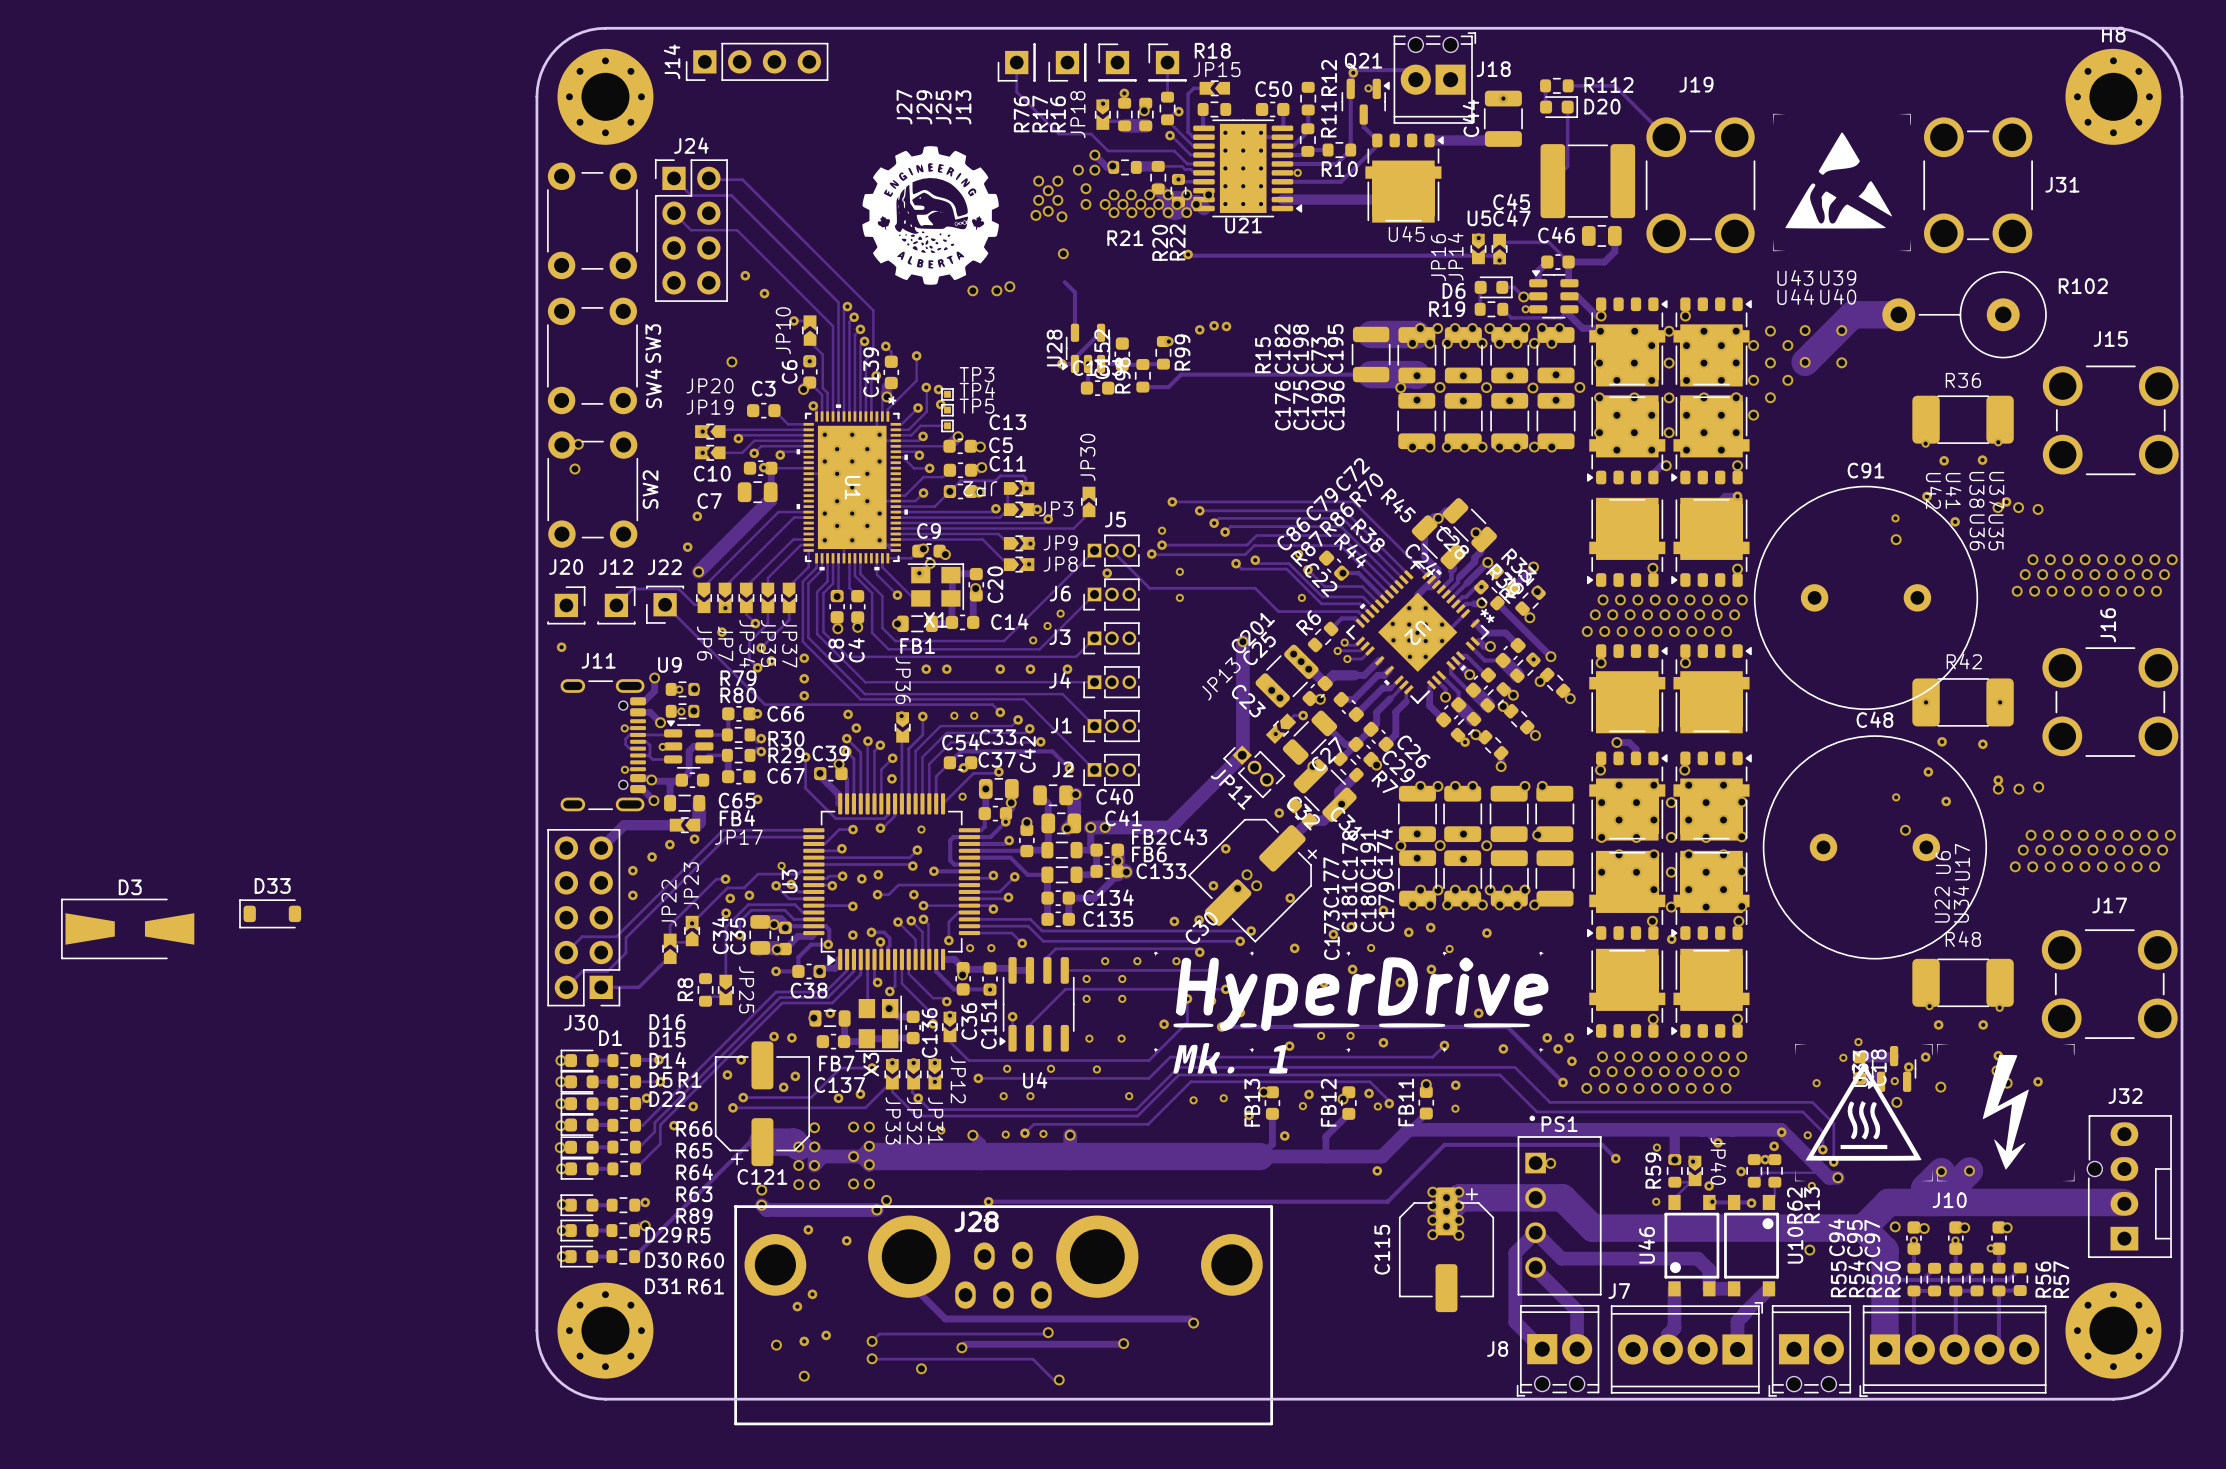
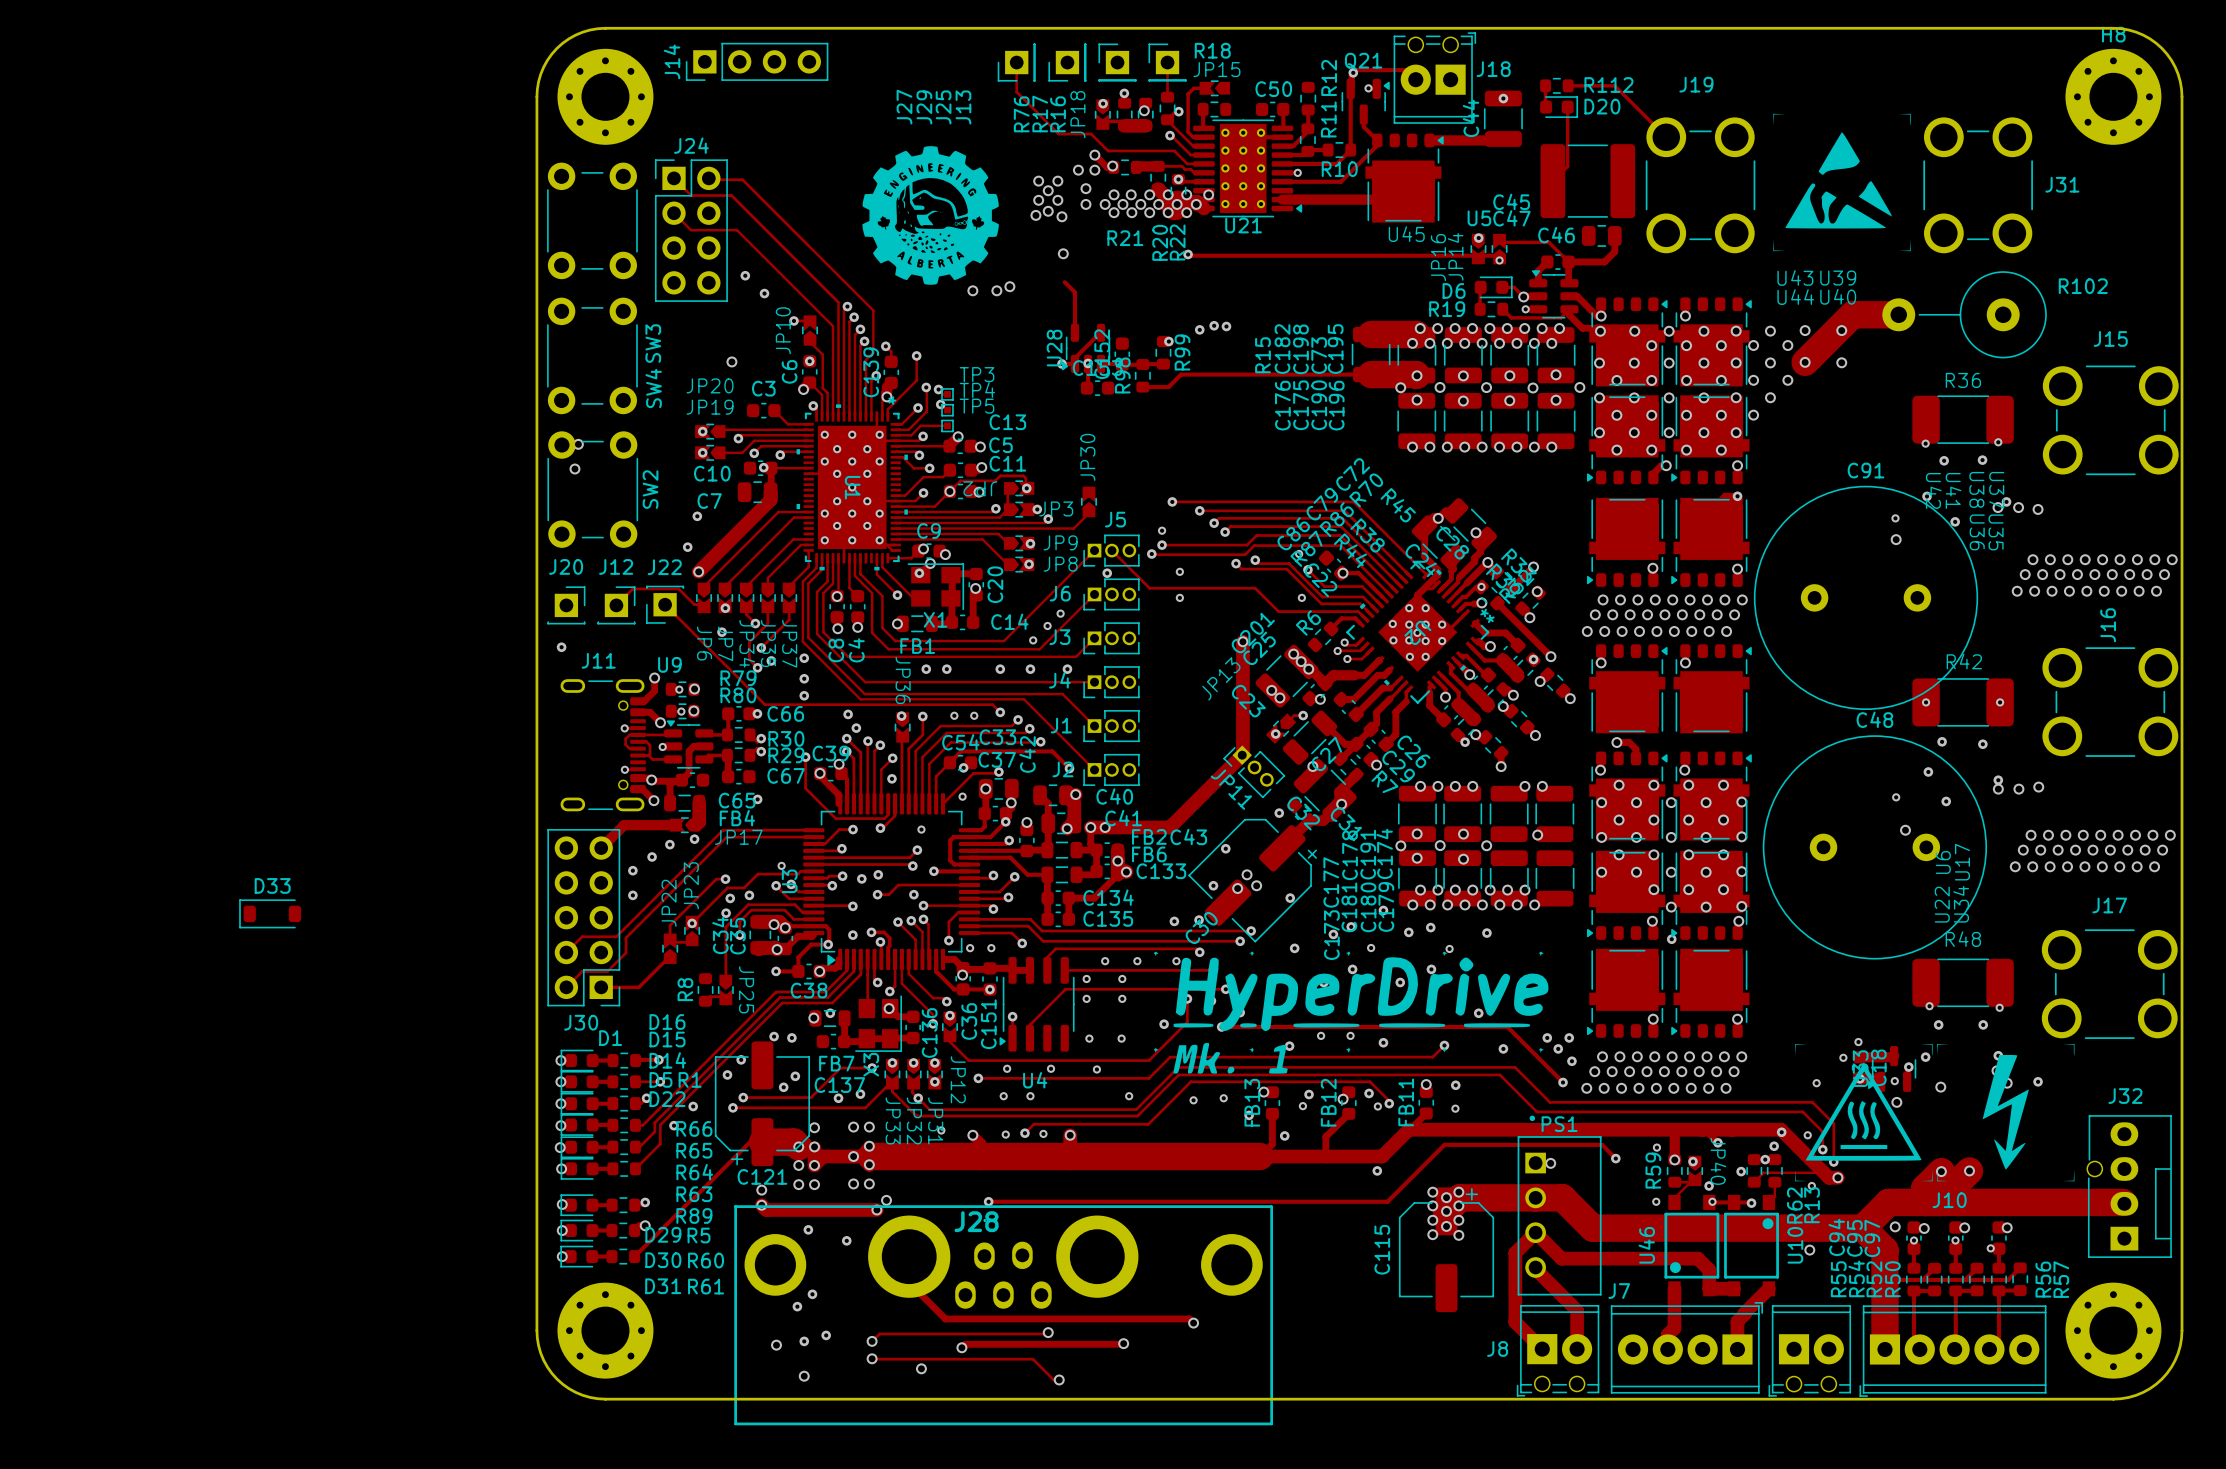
D3: (127, 928) -> none

